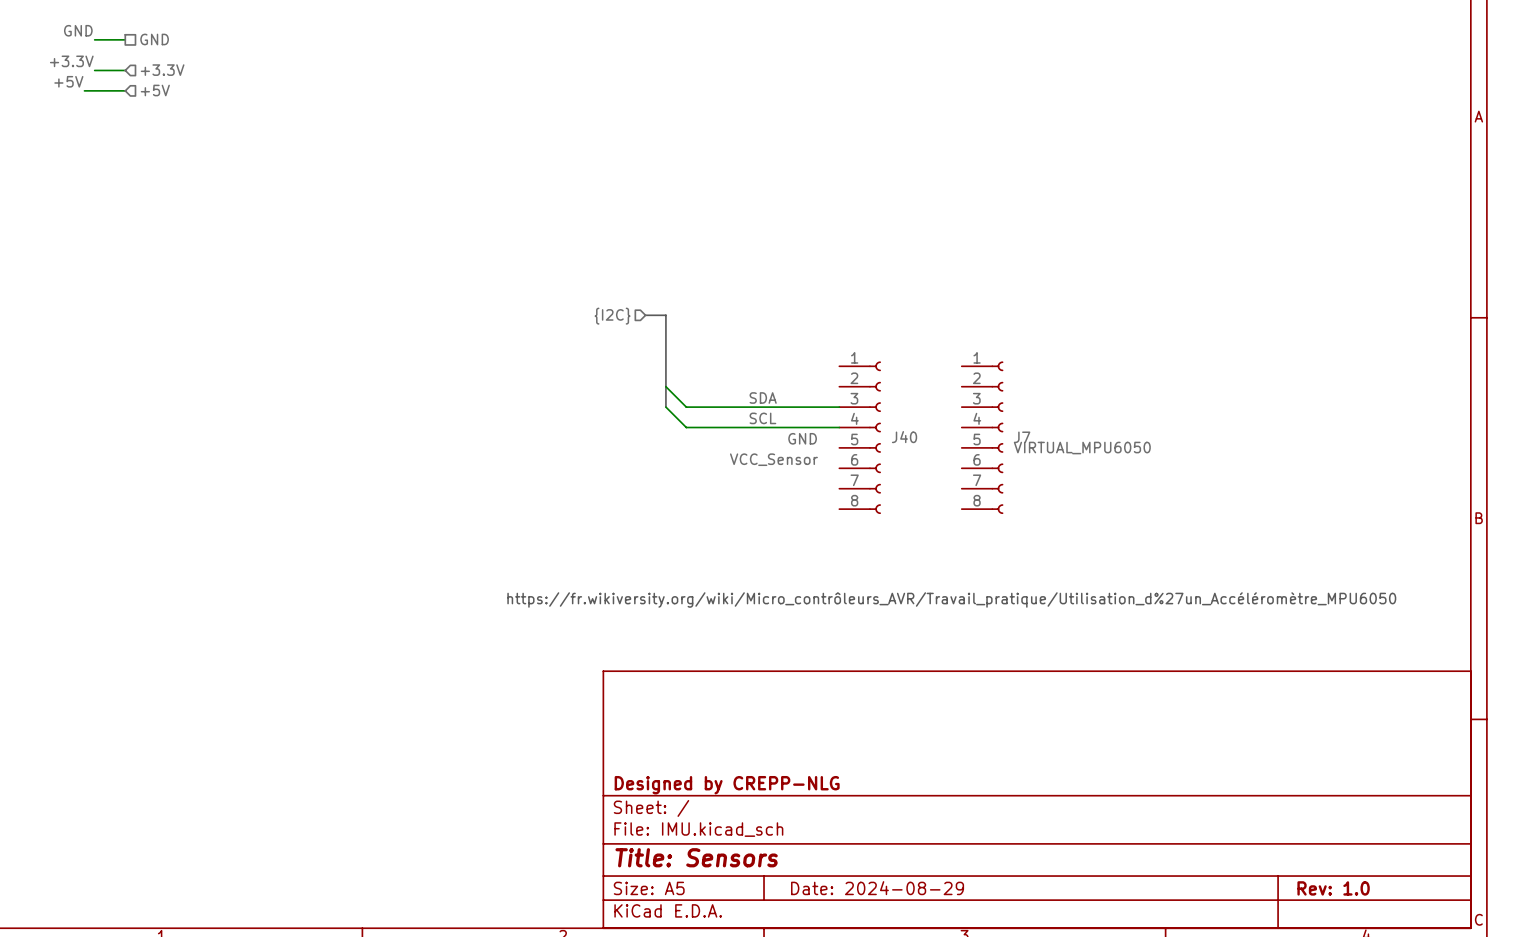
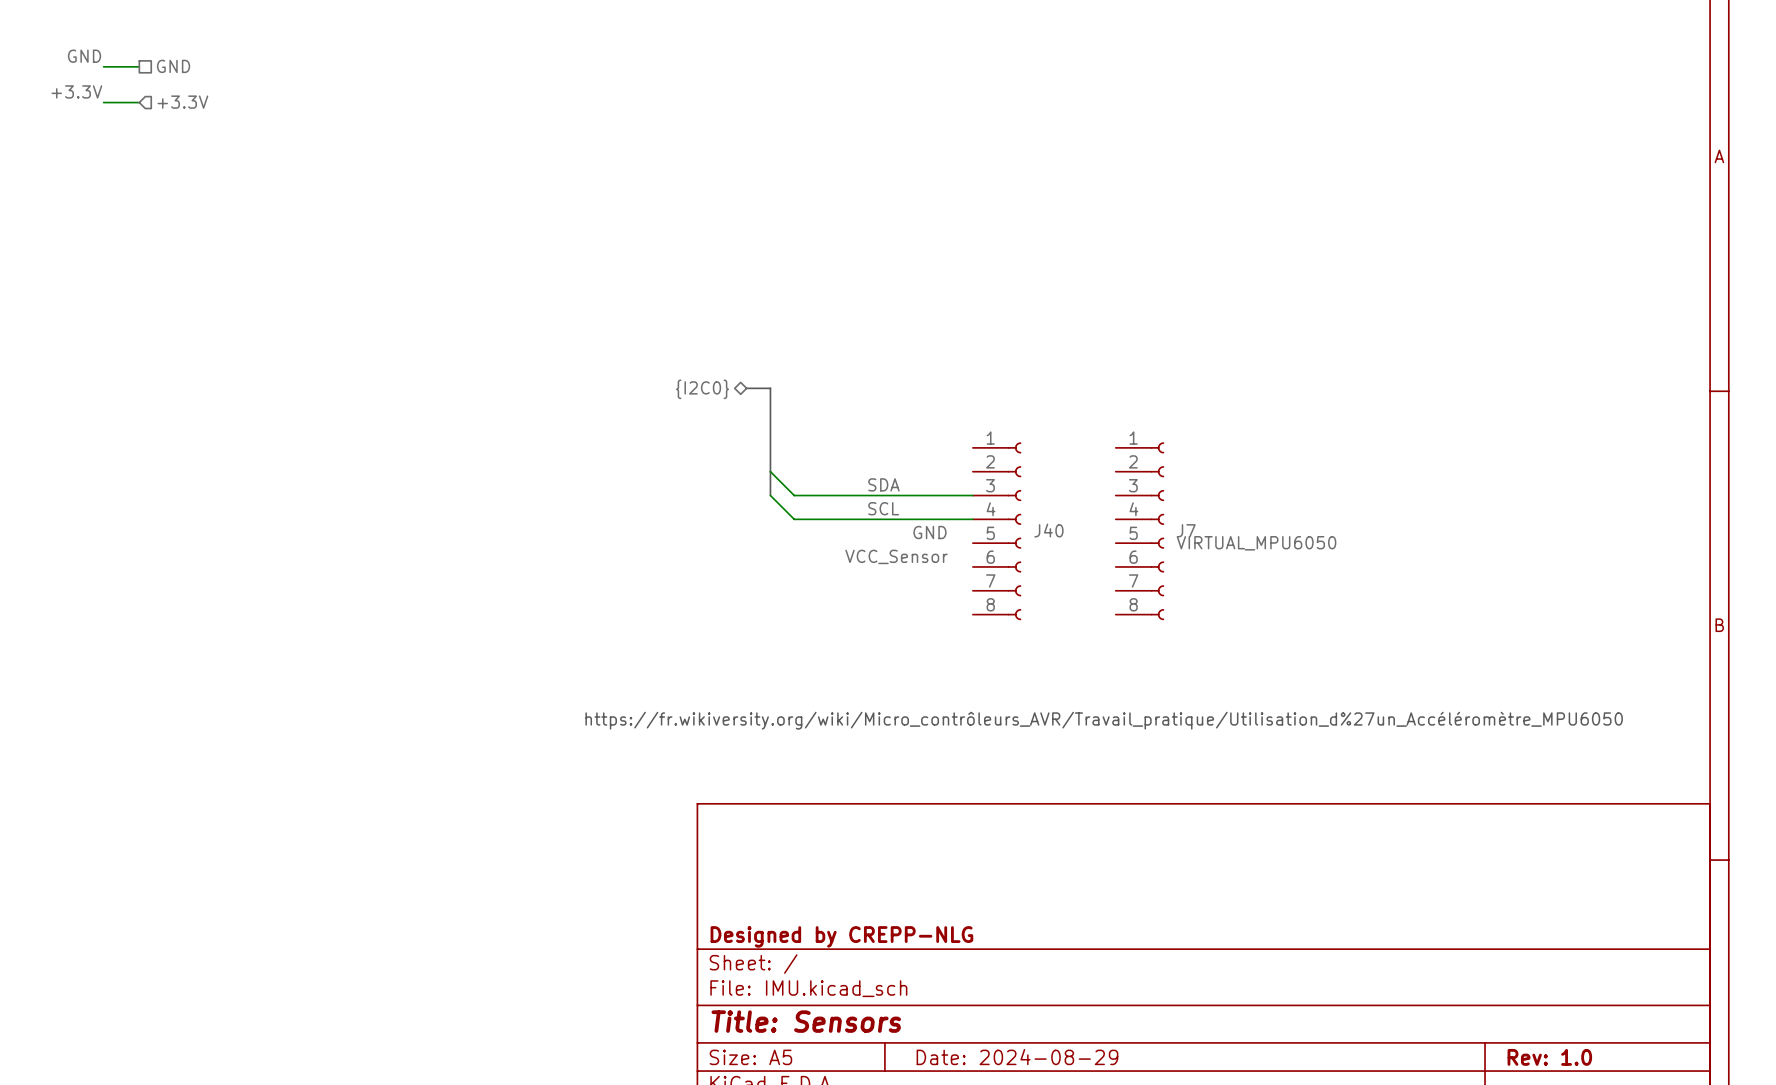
label: +5V (68, 81) -> none
wire: (84, 90) (125, 90) -> none
hierarchical label: +5V (155, 90) -> none
hierarchical label shape: input (612, 316) -> bidirectional (702, 389)
hierarchical label: {I2C} (612, 316) -> {I2C0} (702, 389)

